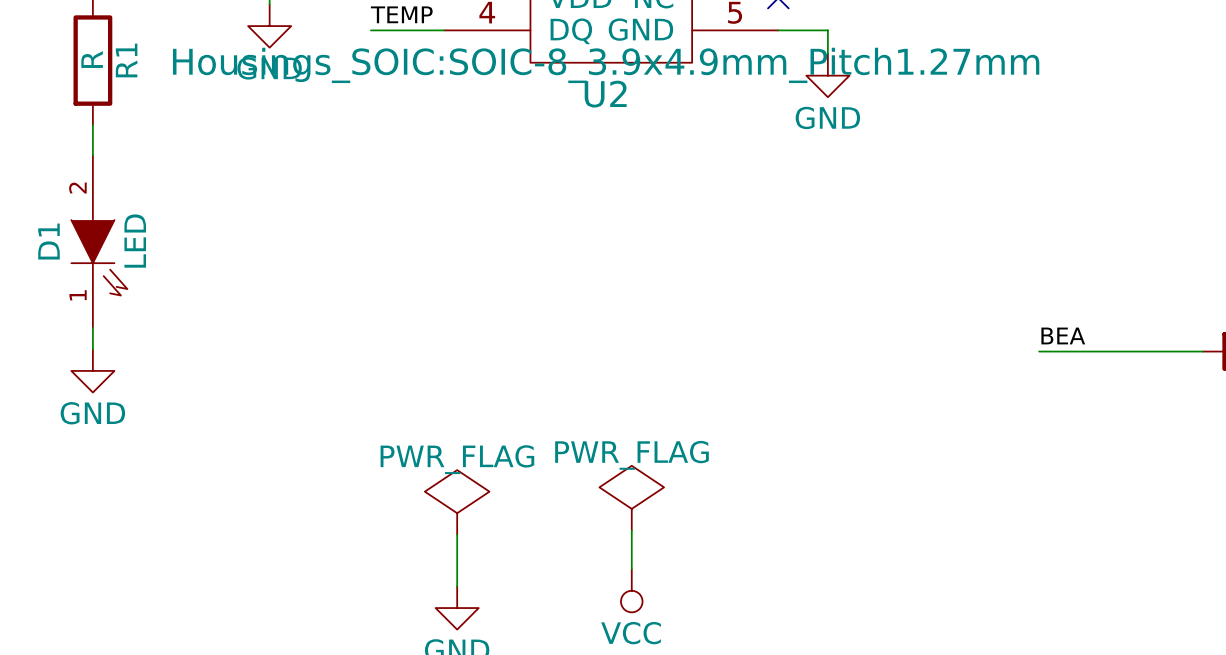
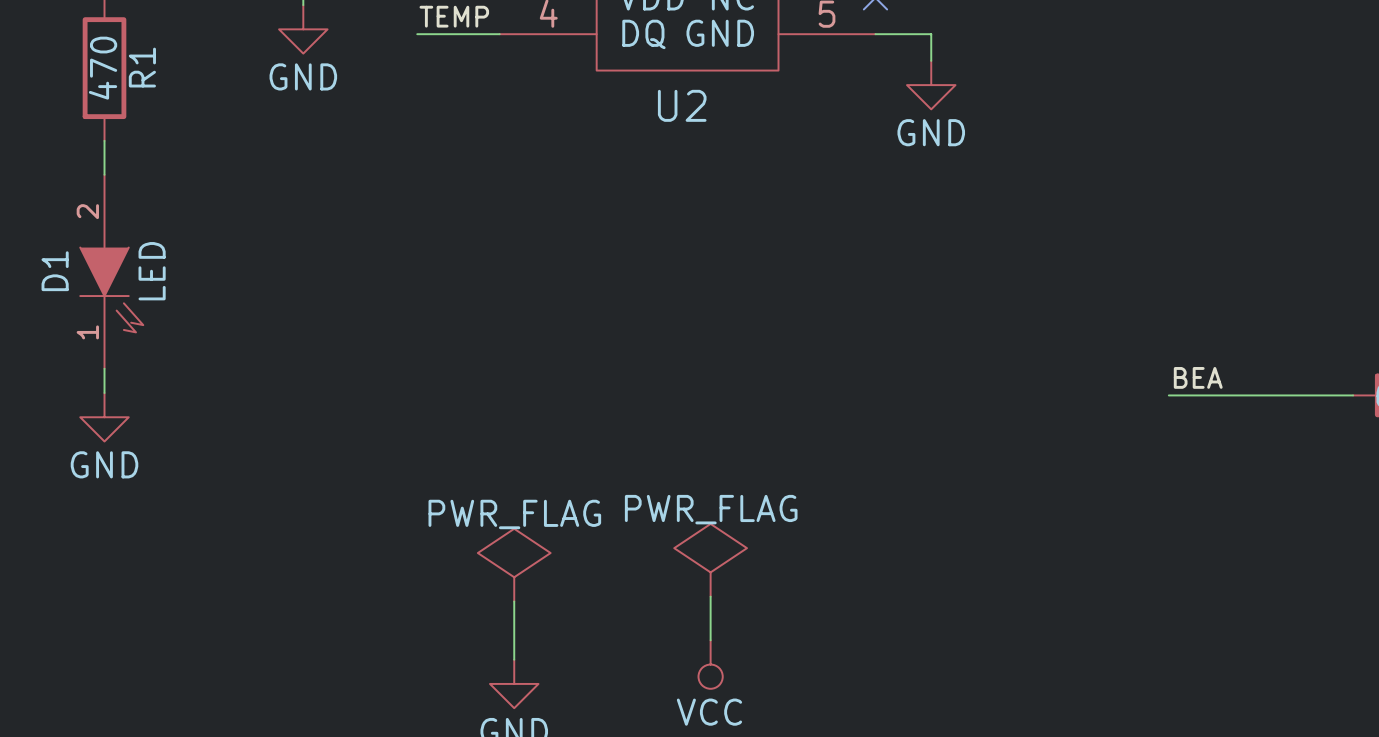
R1 value: R (92, 59) -> 470 (103, 68)
U2 text: Housings_SOIC:SOIC-8_3.9x4.9mm_Pitch1.27mm (606, 65) -> none

